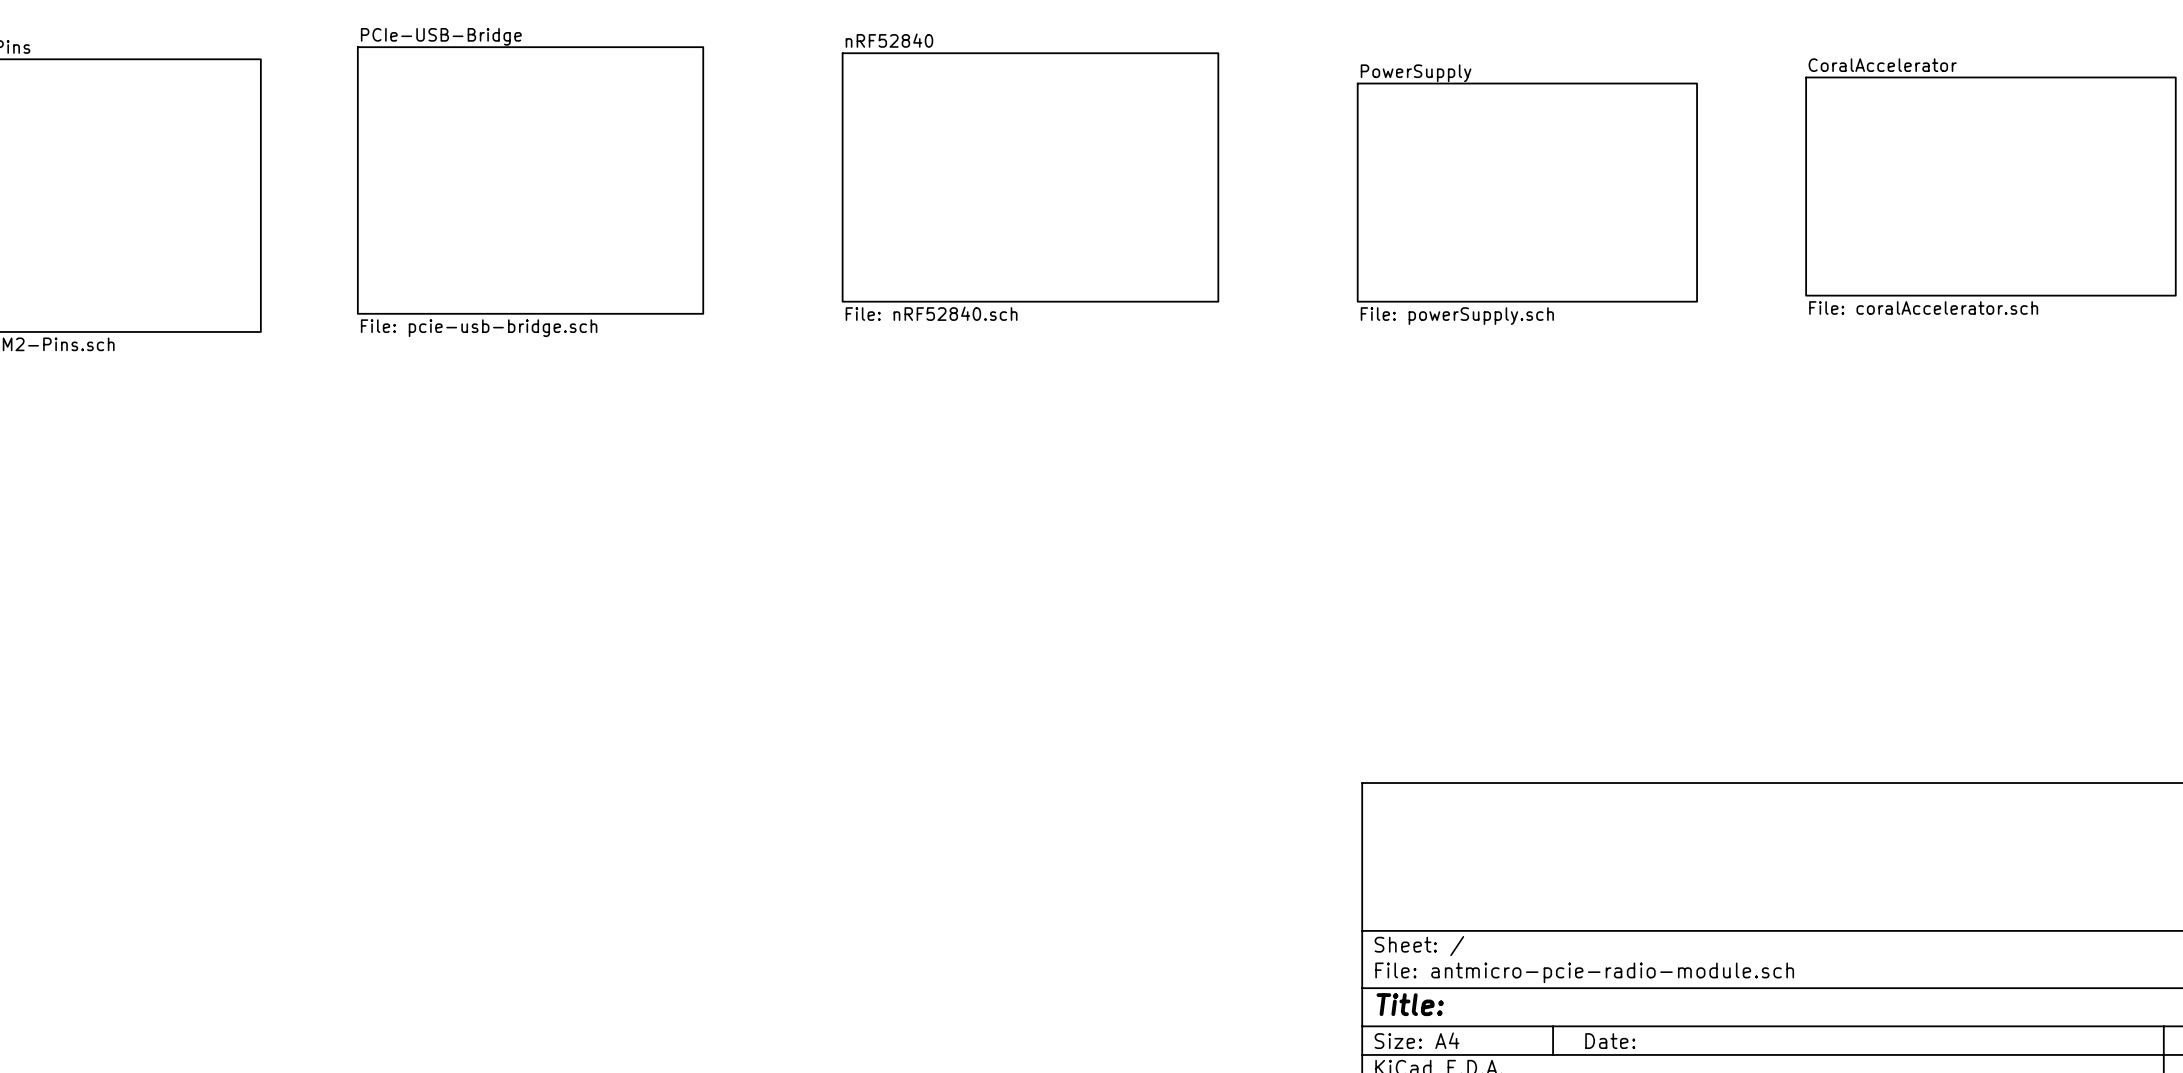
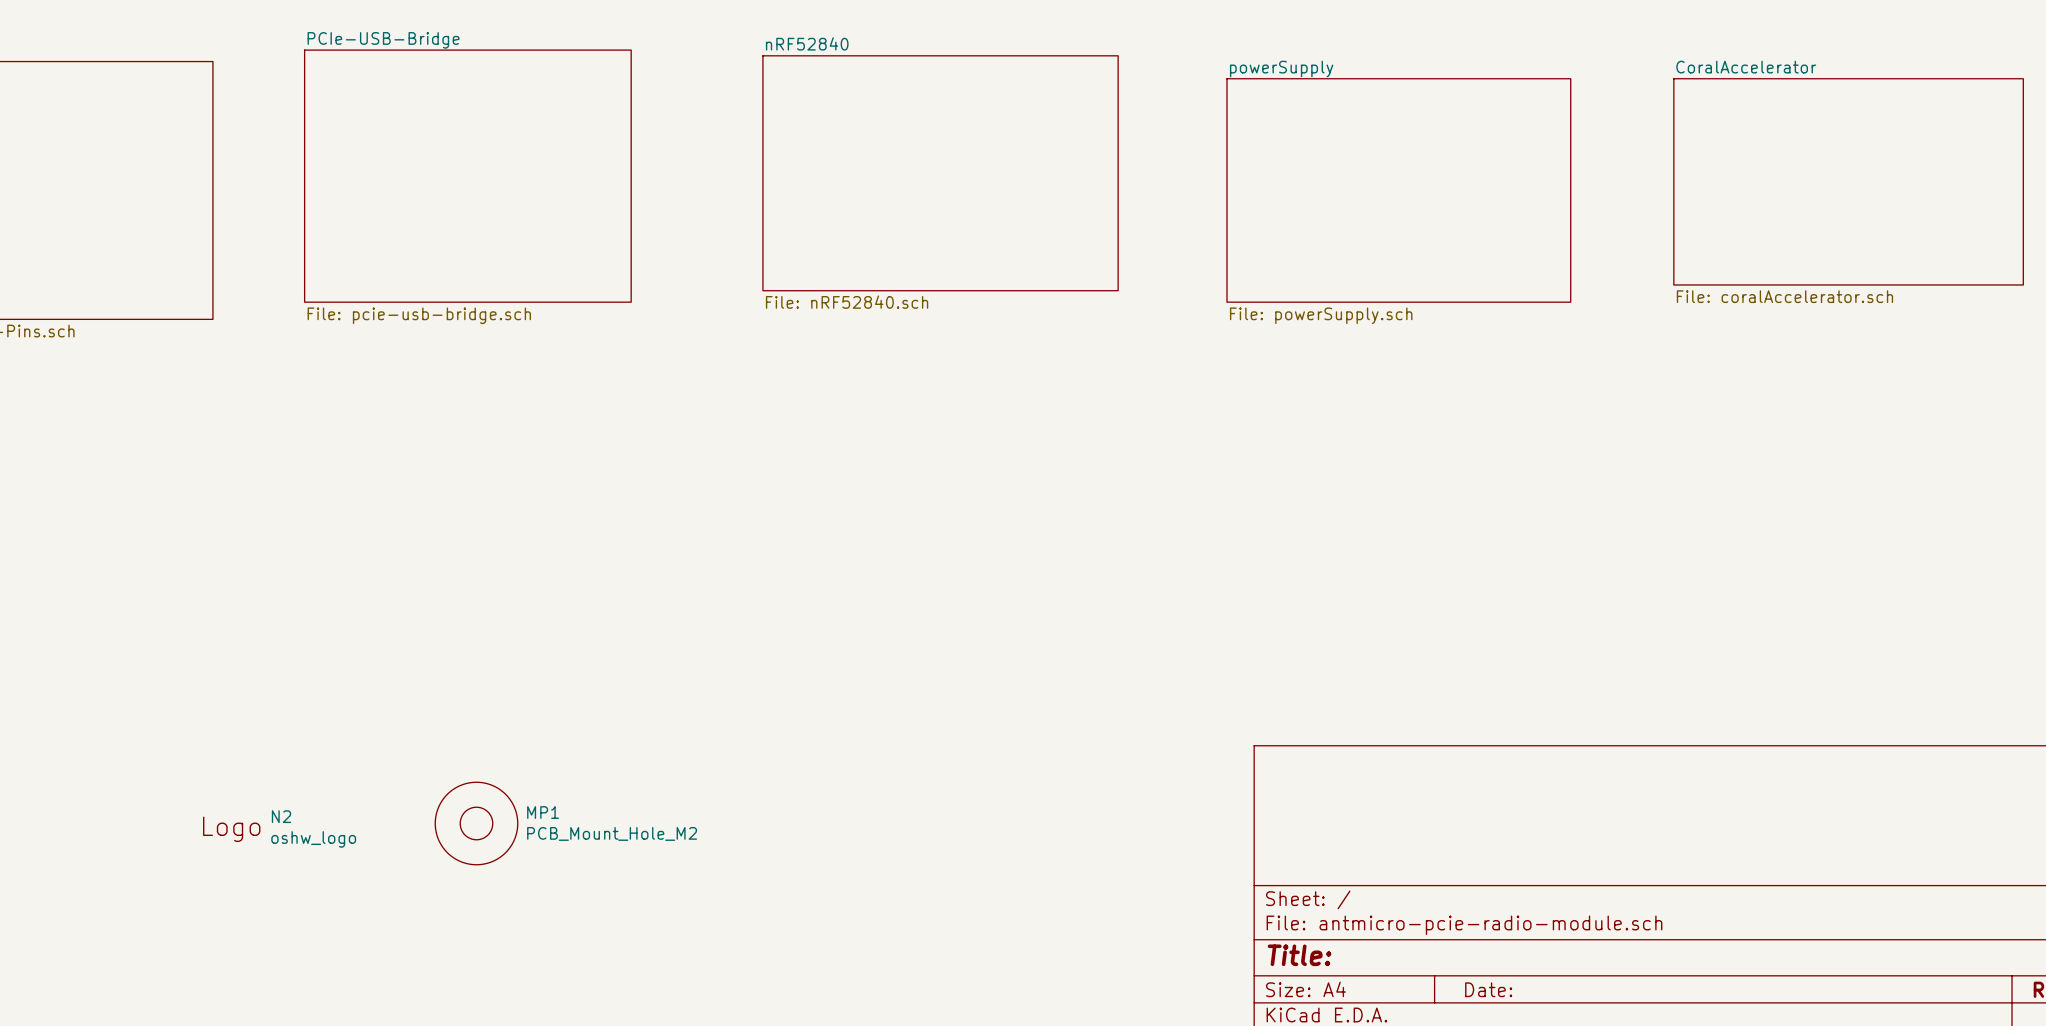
sheet PowerSupply: File: powerSupply.sch (1527, 192) -> none
sheet powerSupply: none -> File: powerSupply.sch (1398, 190)
MP1: none -> PCB_Mount_Hole_M2 (476, 823)
N2: none -> oshw_logo (279, 829)

